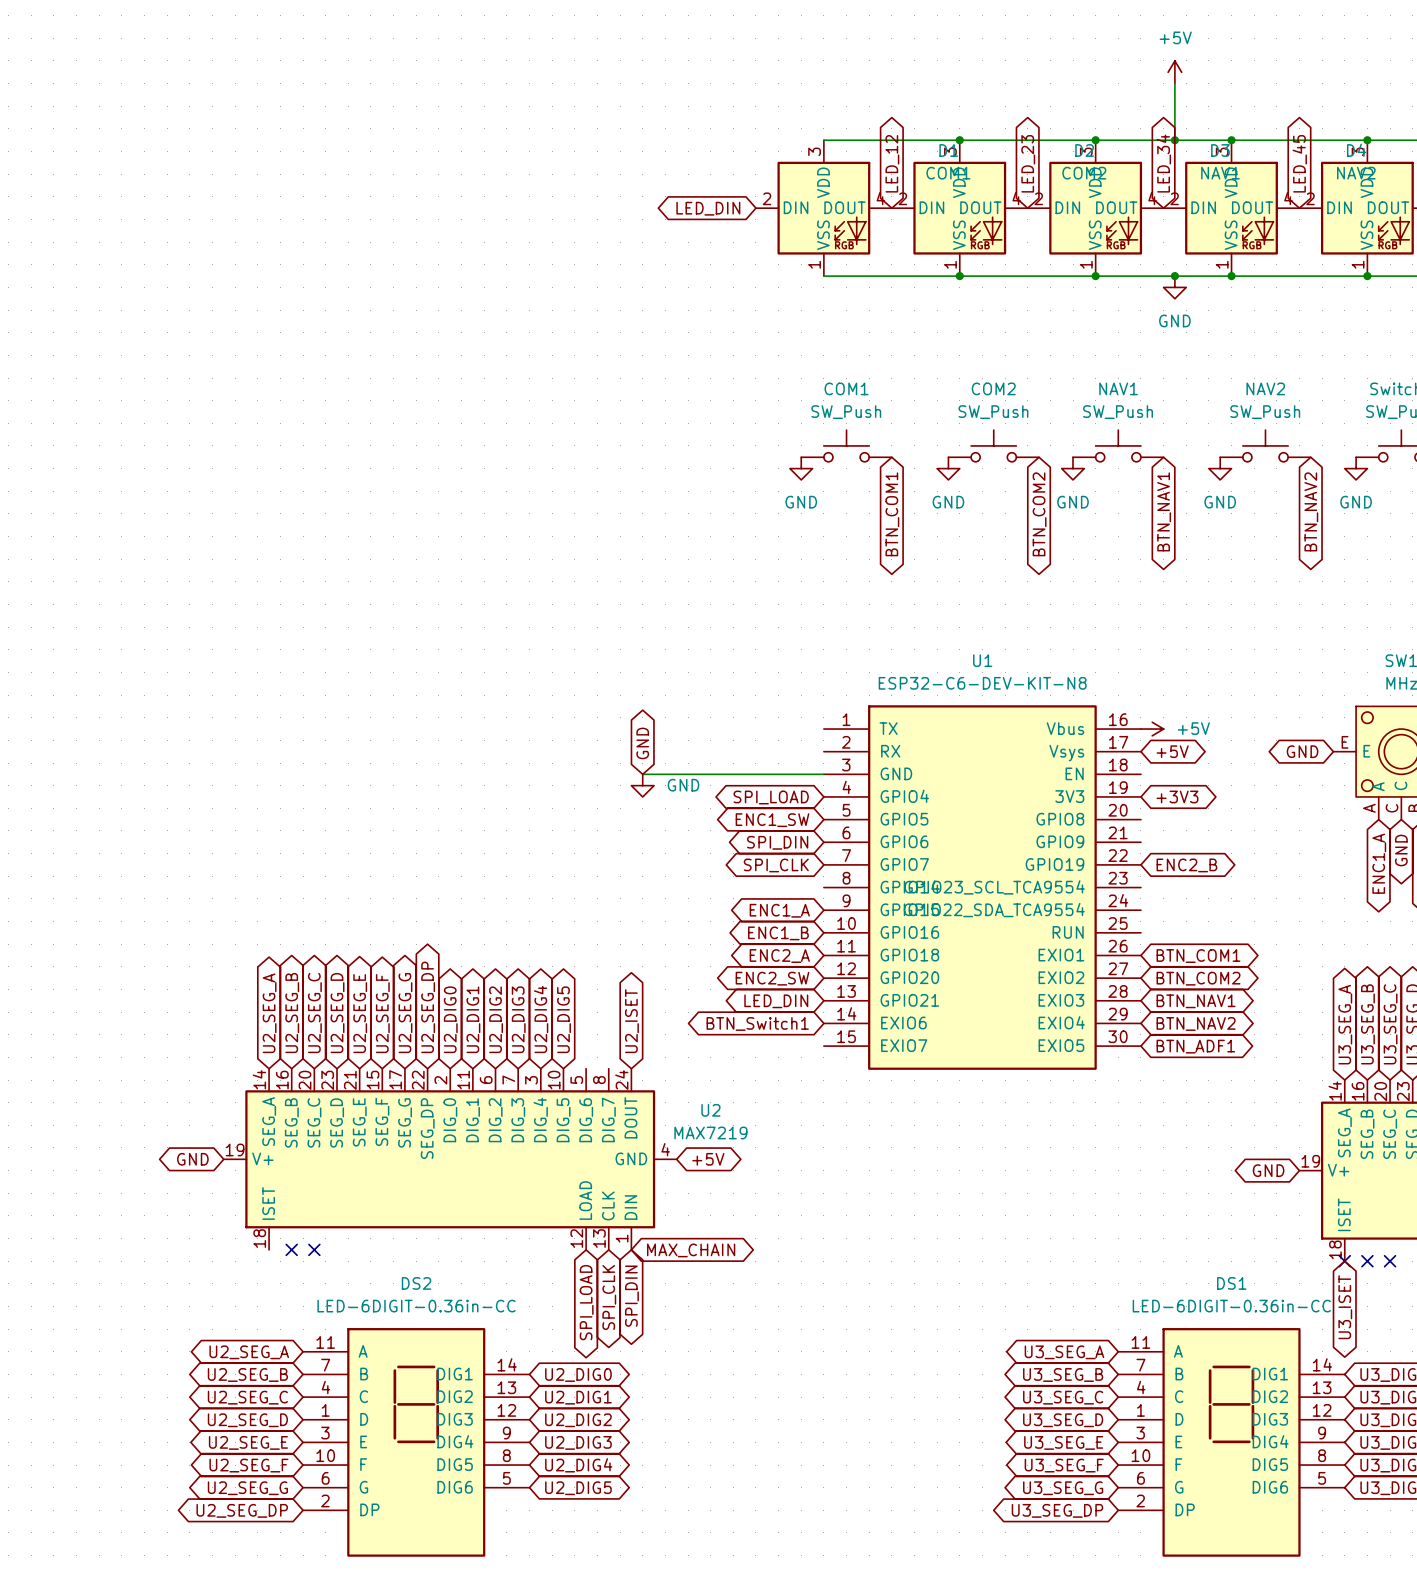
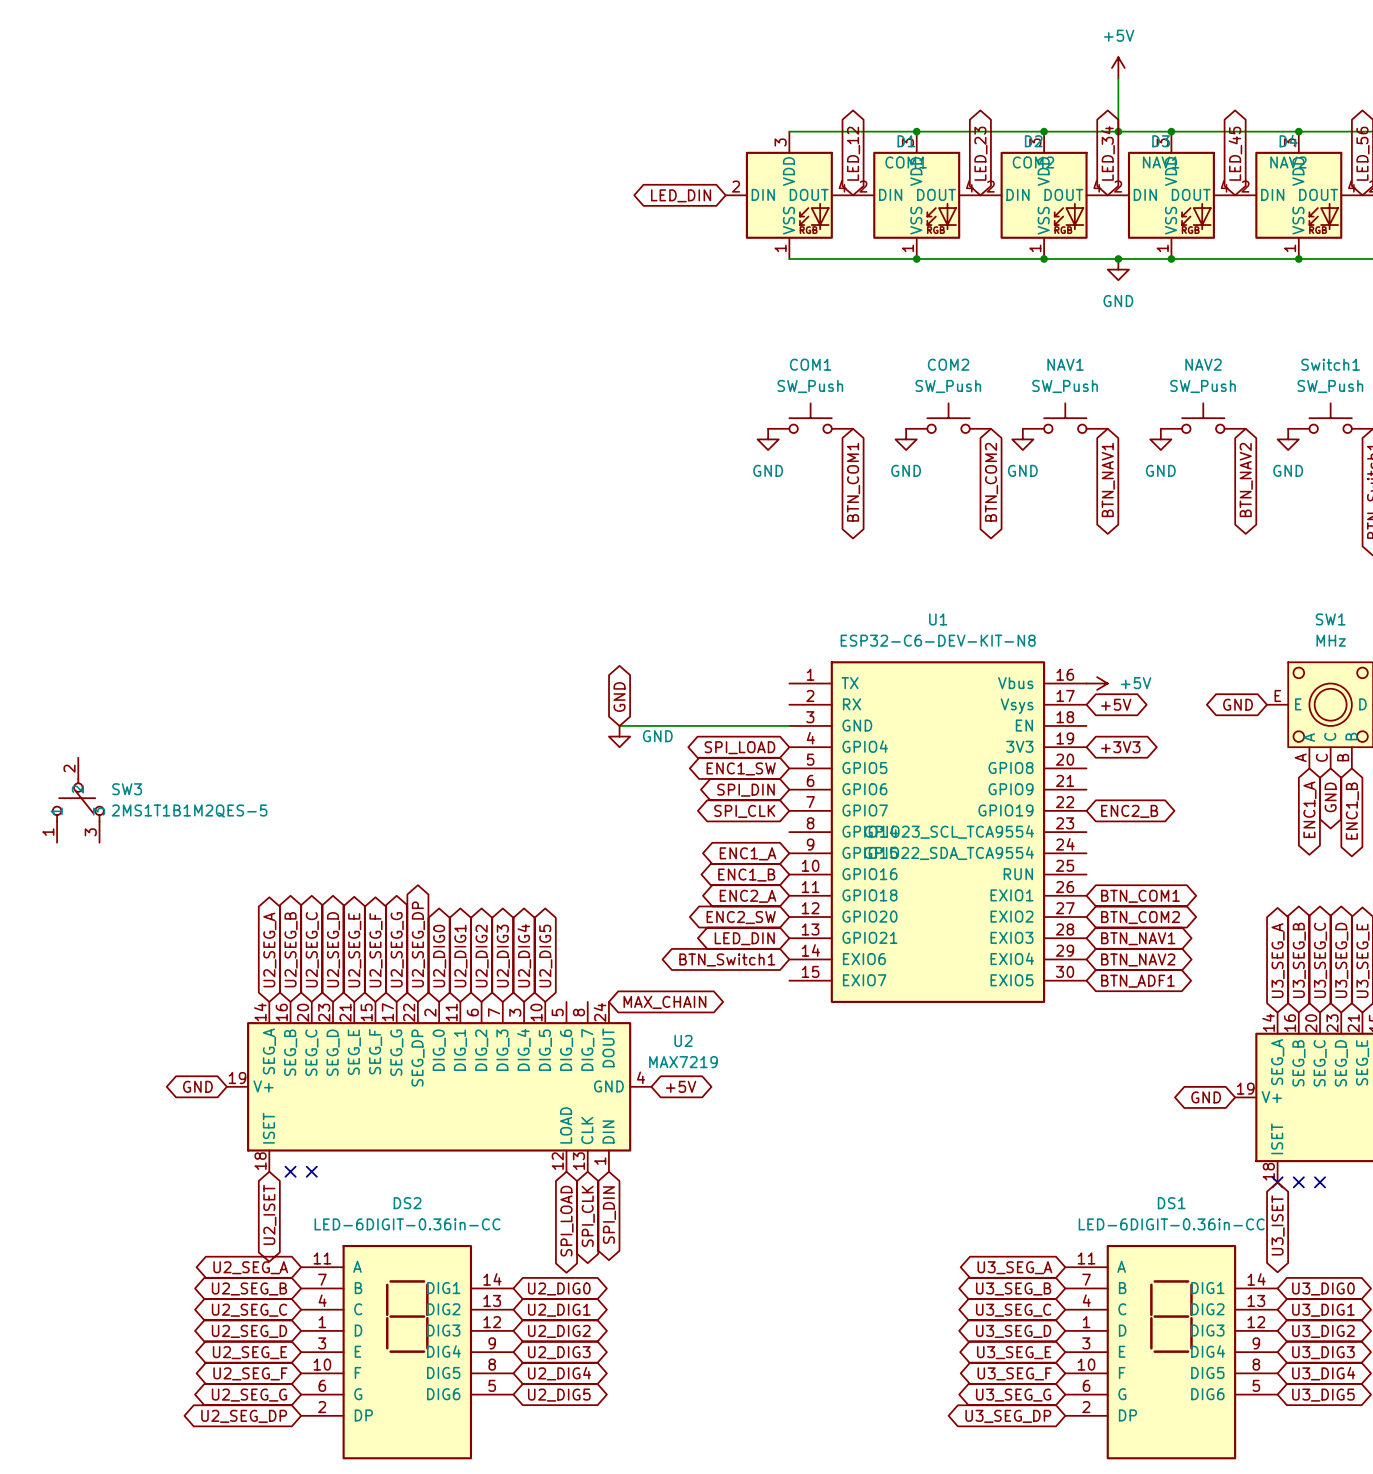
SW3: none -> 2MS1T1B1M2QES-5 (78, 800)
global label: U2_ISET (631, 1021) -> MAX_CHAIN (664, 1002)
global label: MAX_CHAIN (691, 1250) -> none
global label: none -> U2_ISET (269, 1214)

